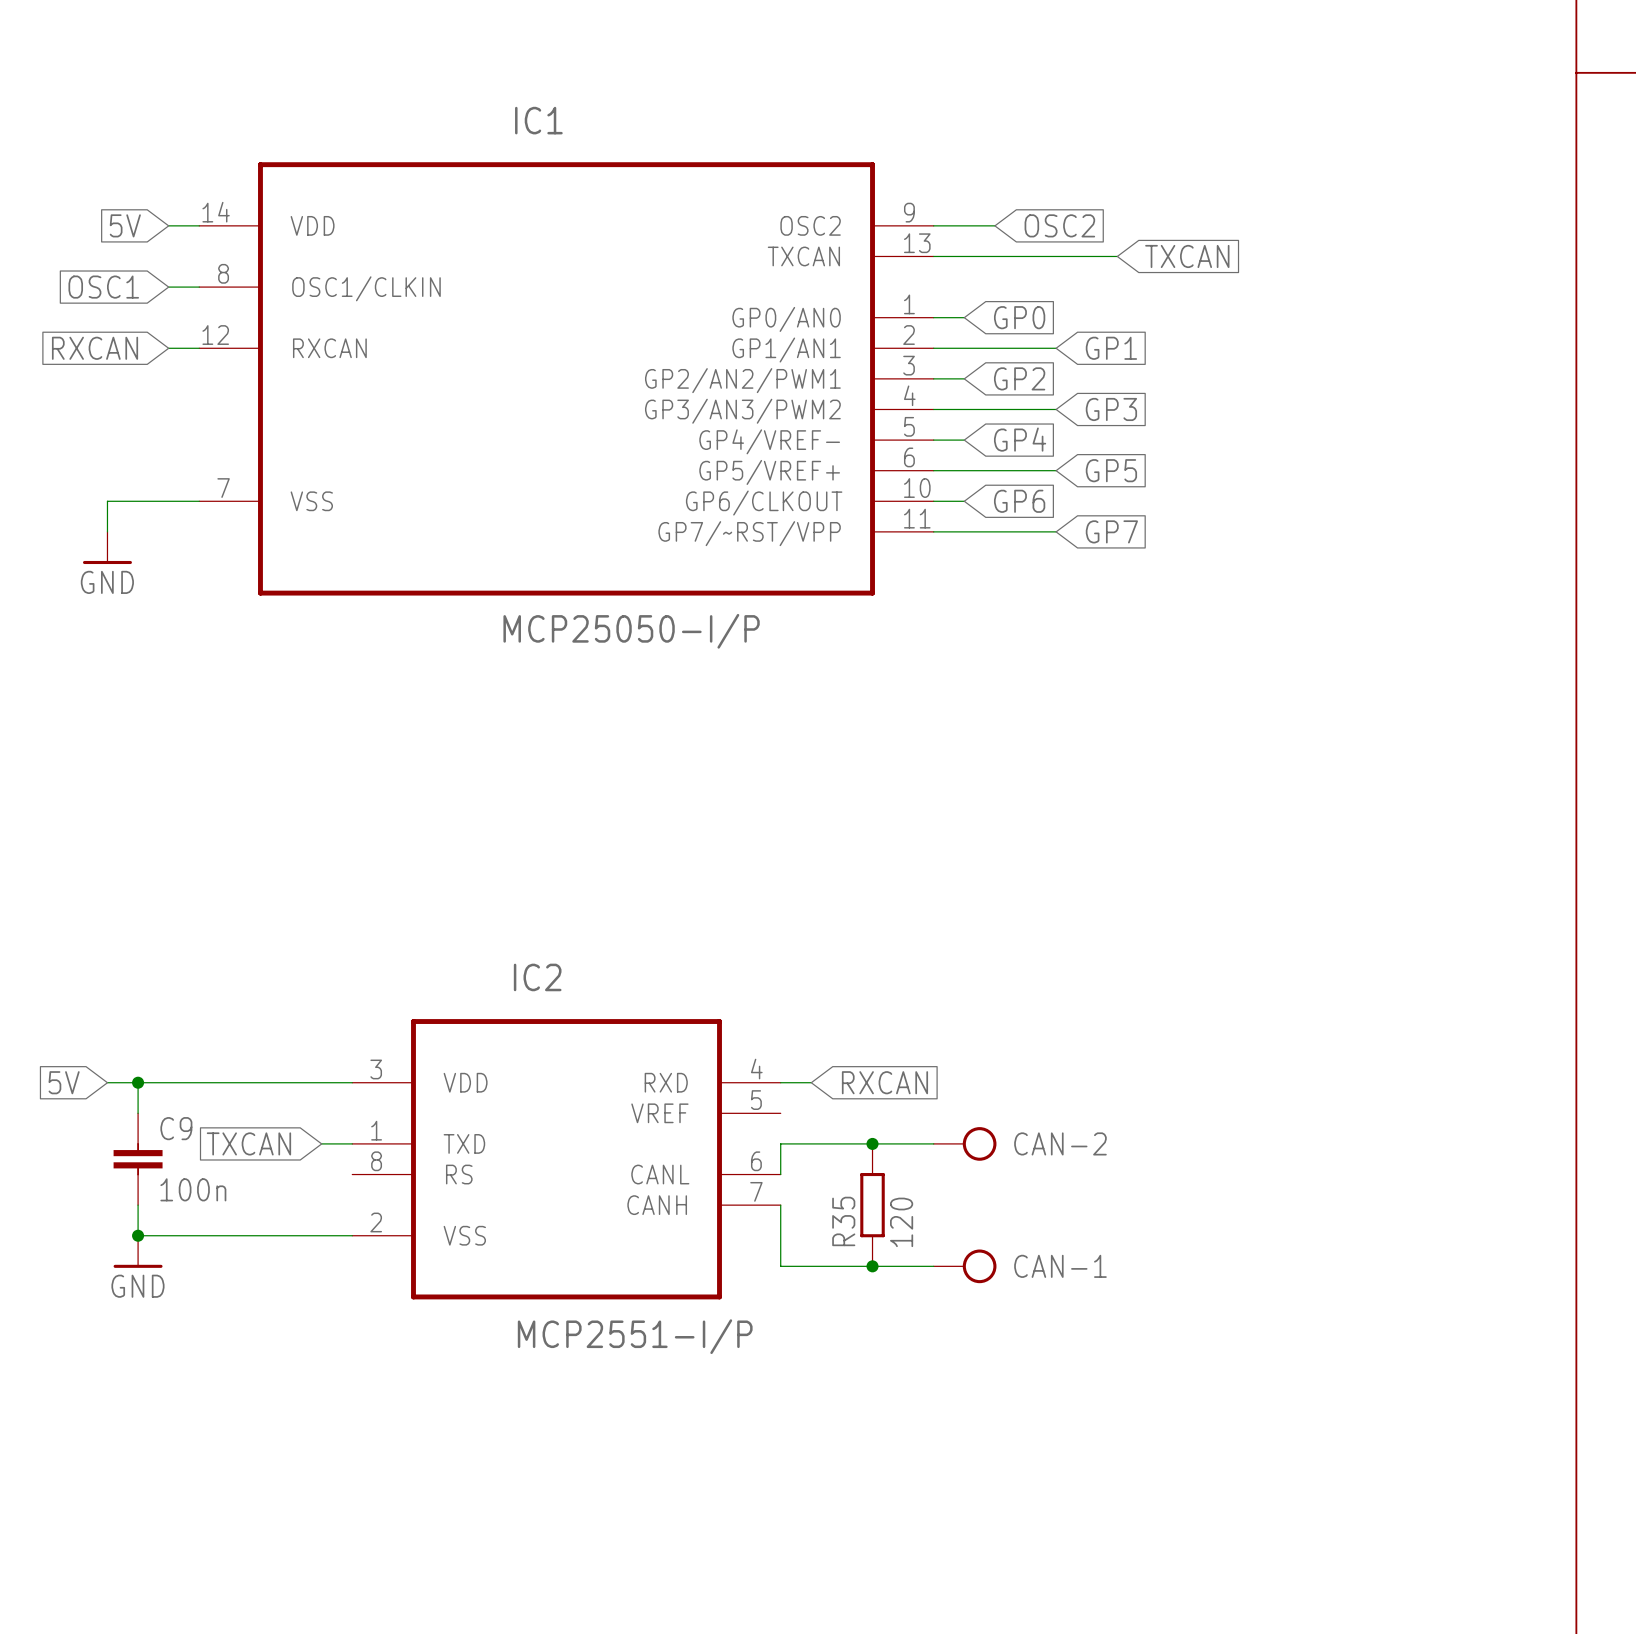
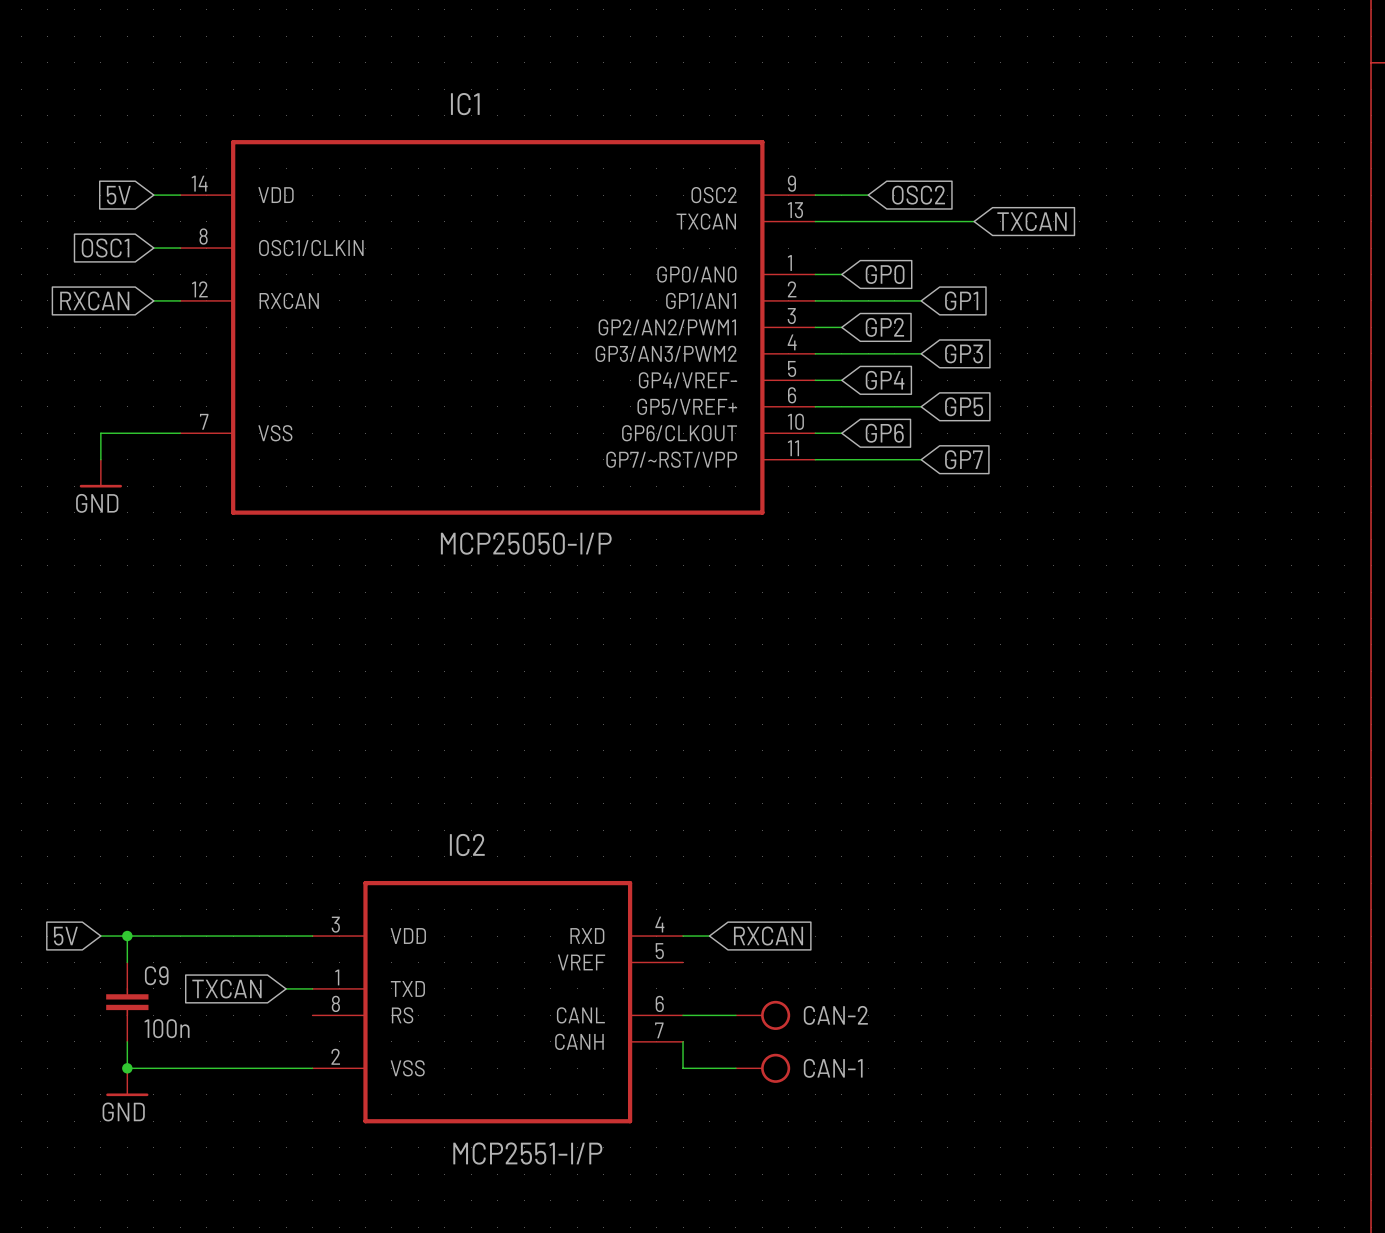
junction: (872, 1143) -> none
wire: (933, 1143) (780, 1143) (780, 1174) -> (735, 1015) (683, 1015)
CAN-2 position: (965, 1143) -> (763, 1015)
R35: 120 (872, 1205) -> none
wire: (780, 1235) (780, 1266) (933, 1266) -> (683, 1068) (735, 1068)
junction: (872, 1266) -> none
CAN-1 position: (965, 1266) -> (763, 1068)

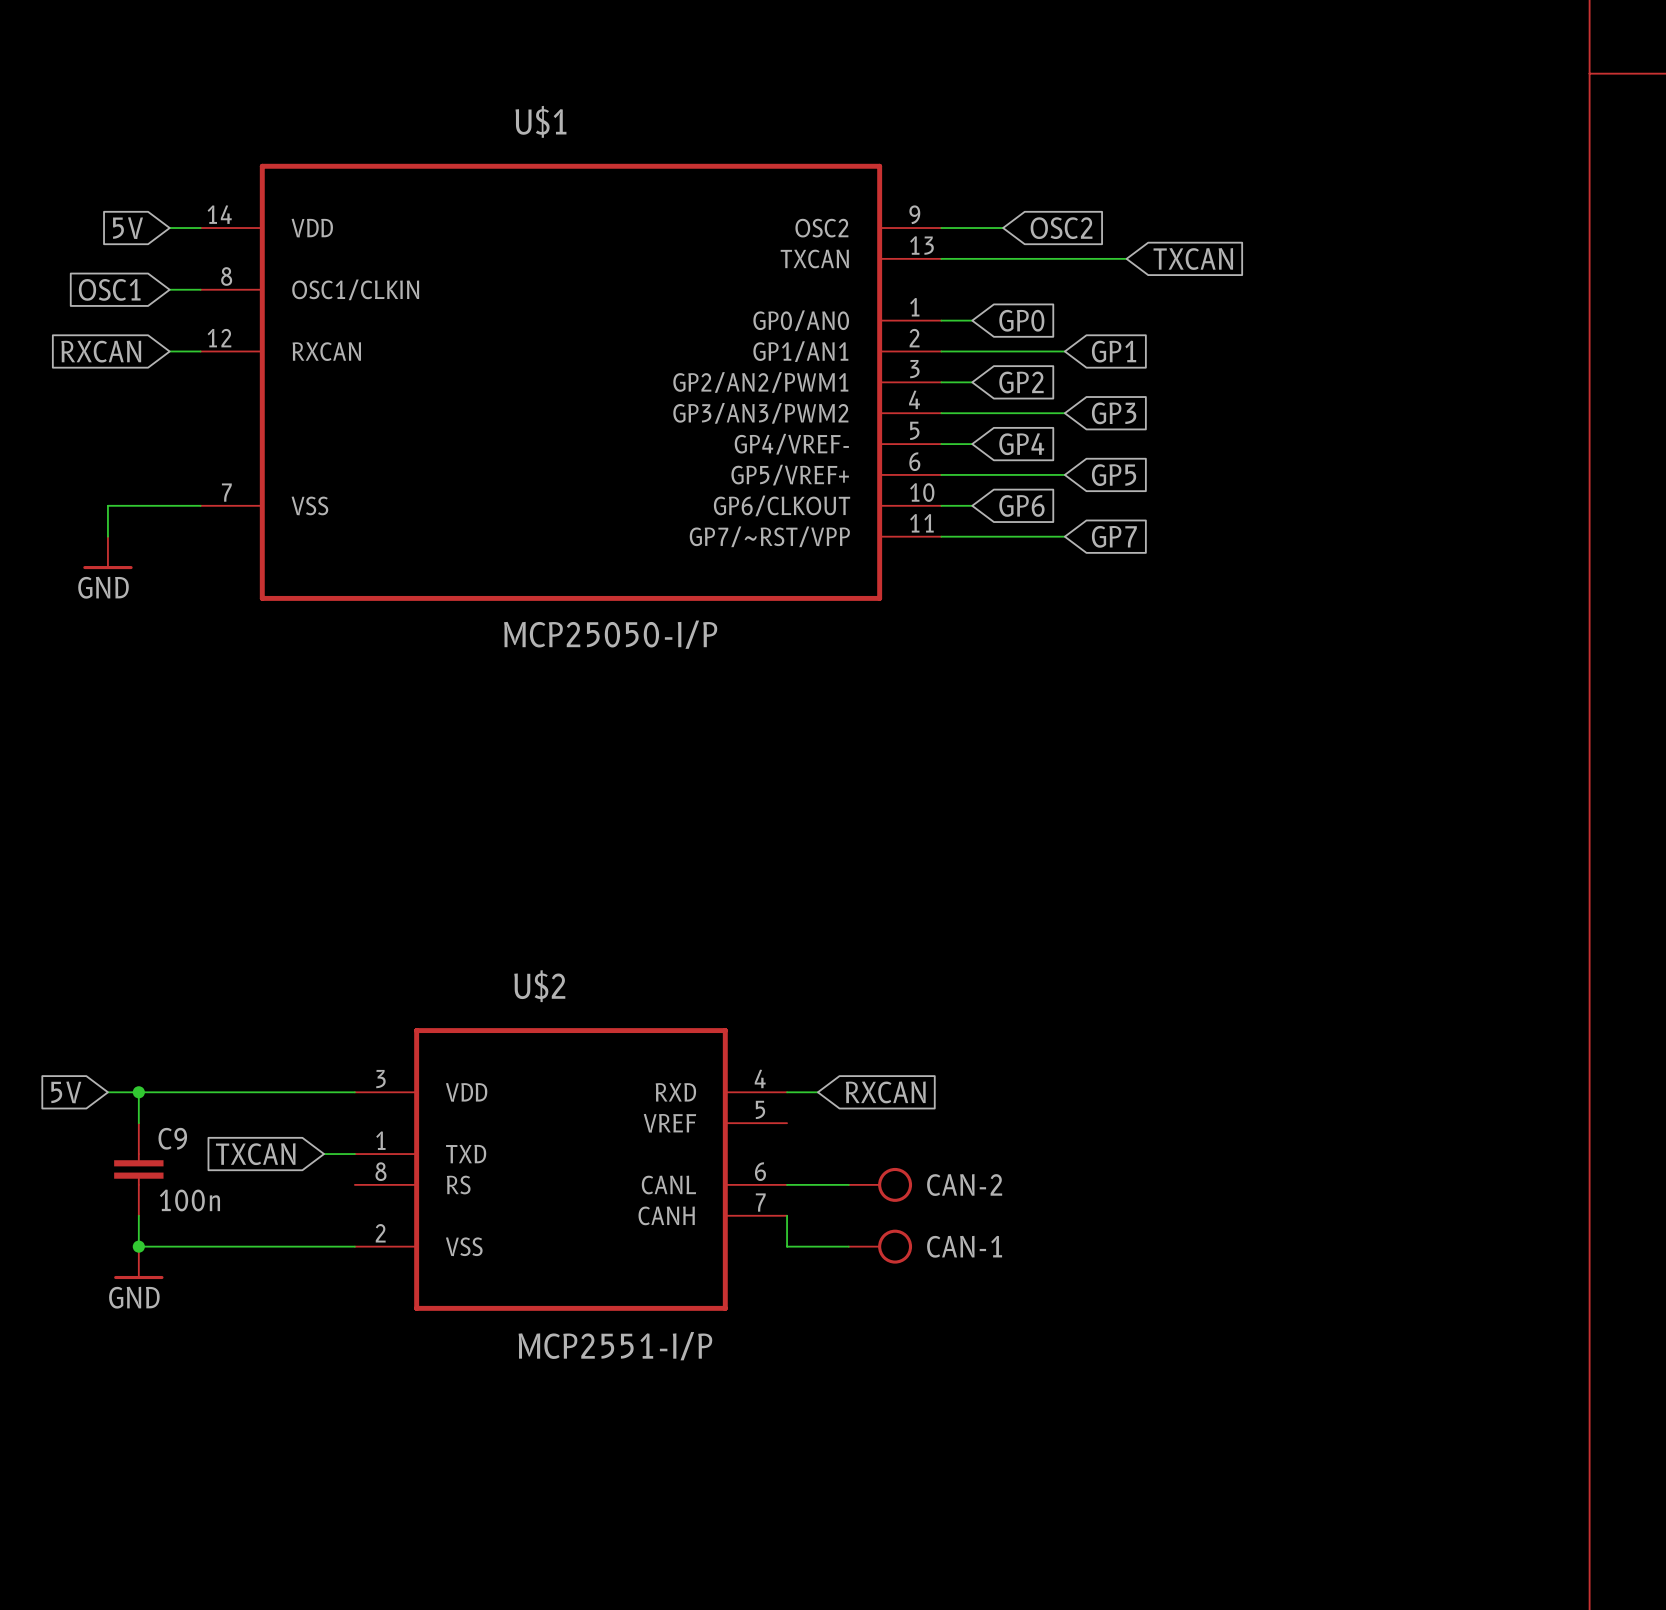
IC1 name: IC1 (465, 104) -> U$1 (540, 121)
IC2 name: IC2 (467, 845) -> U$2 (539, 986)

